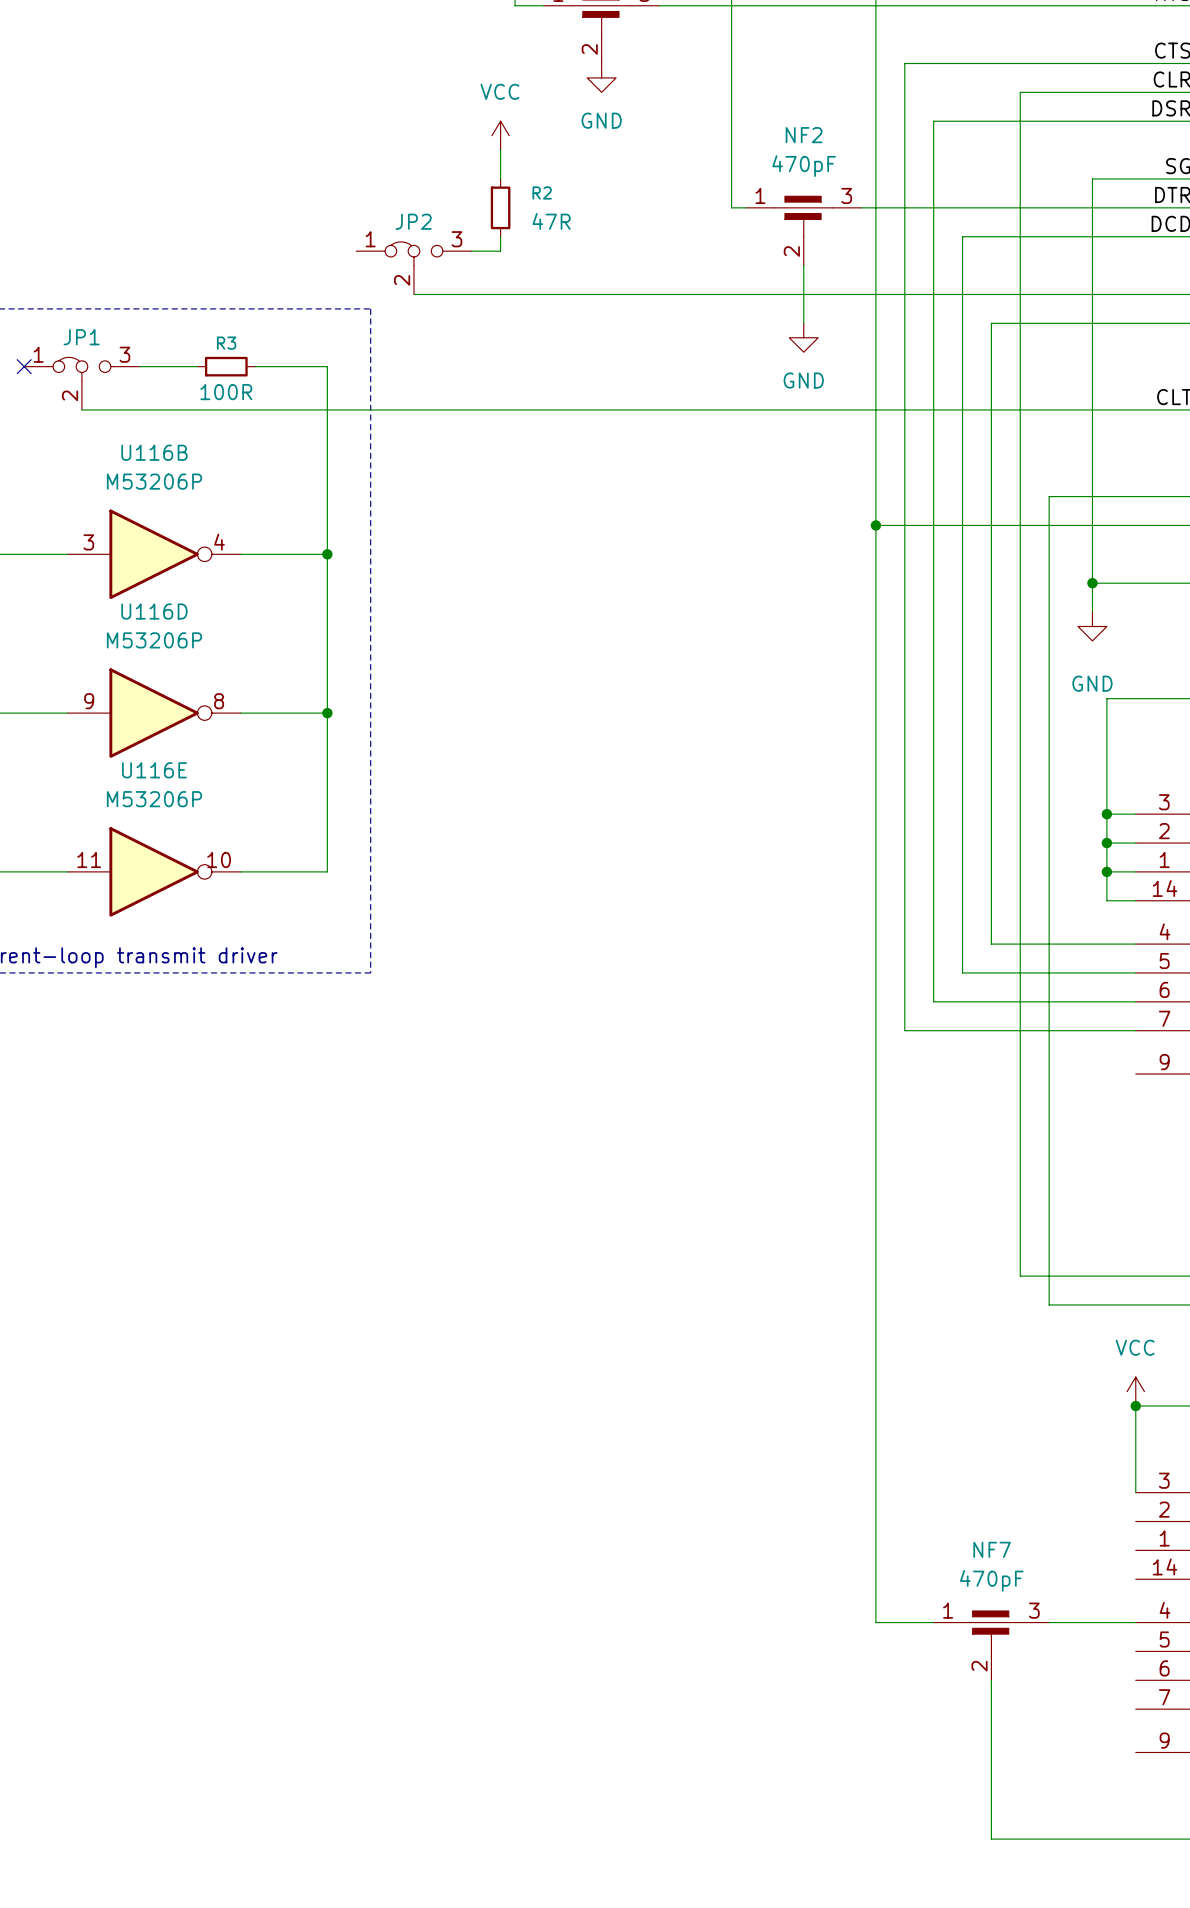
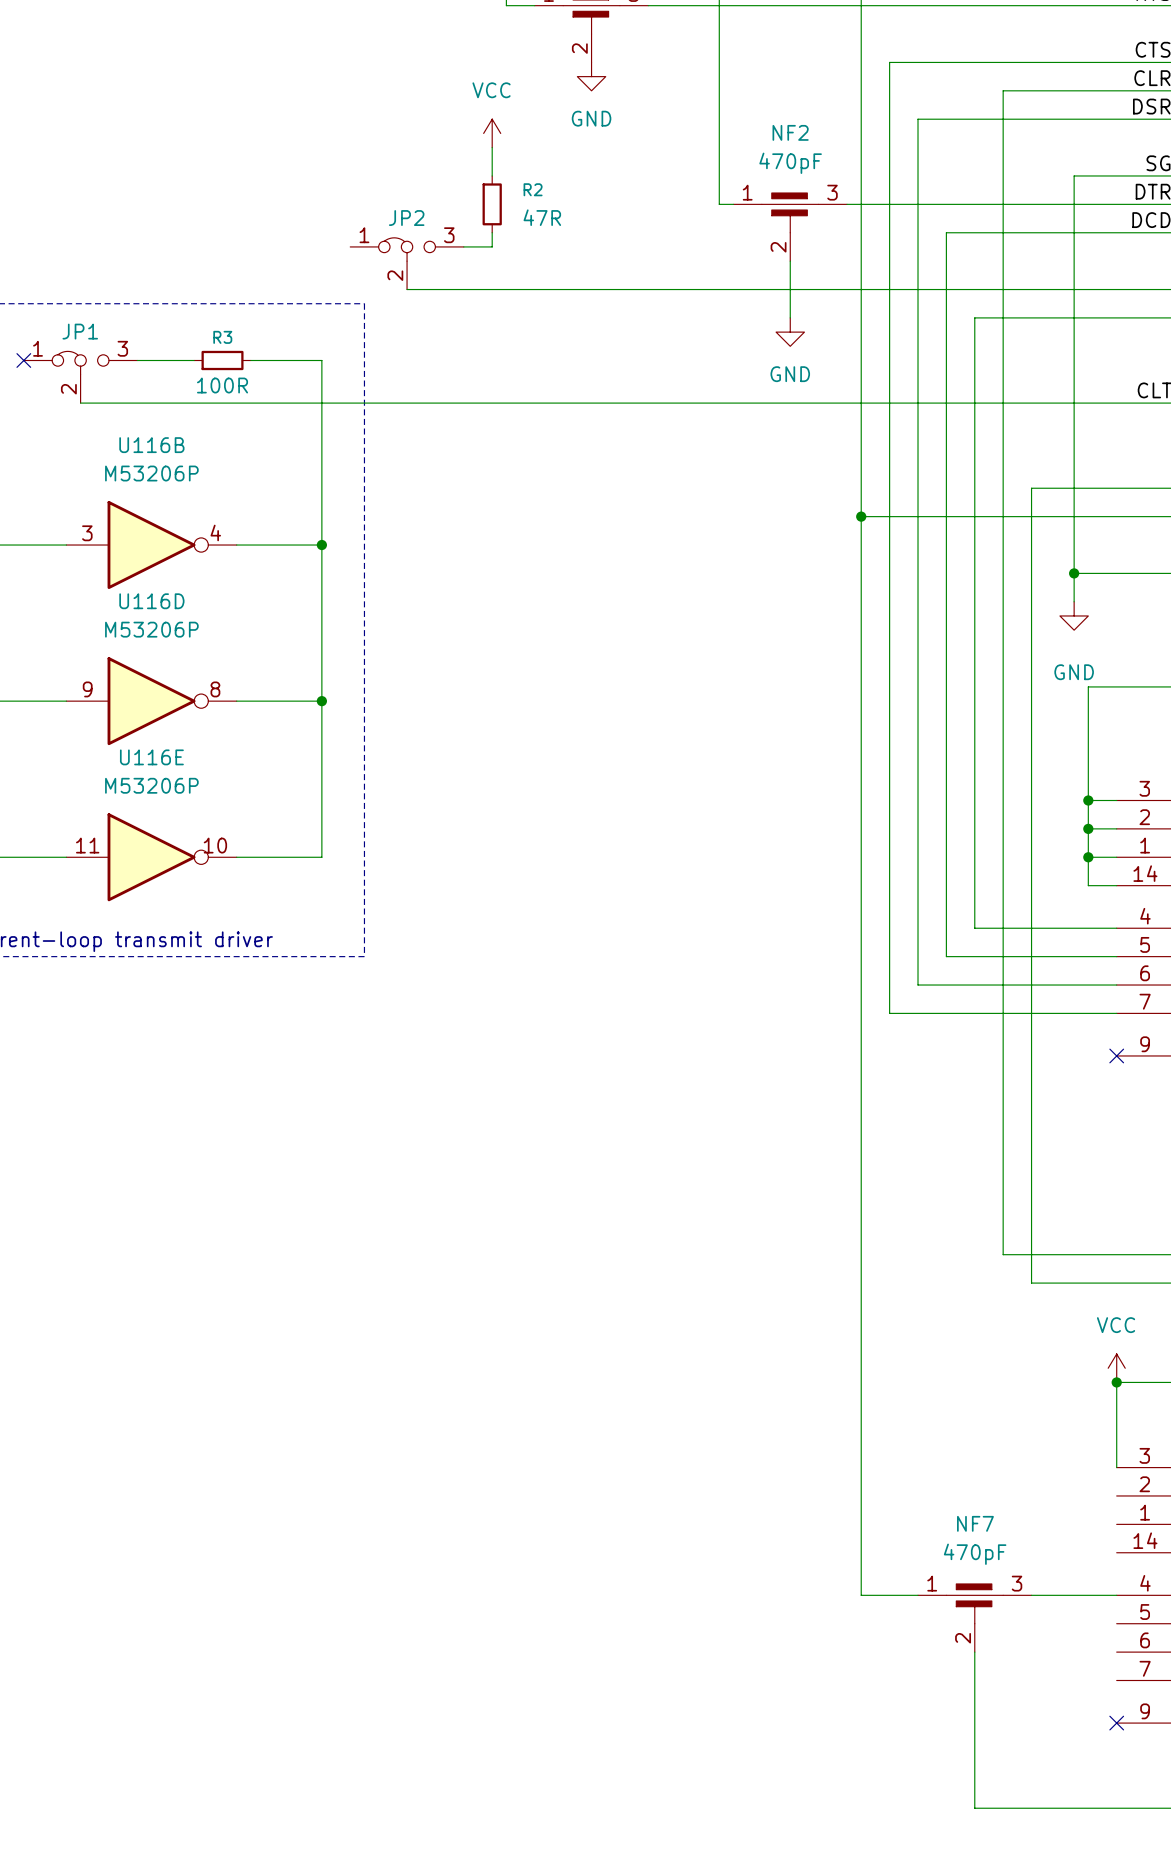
no-connect mark: none -> (1116, 1055)
no-connect mark: none -> (1116, 1723)

